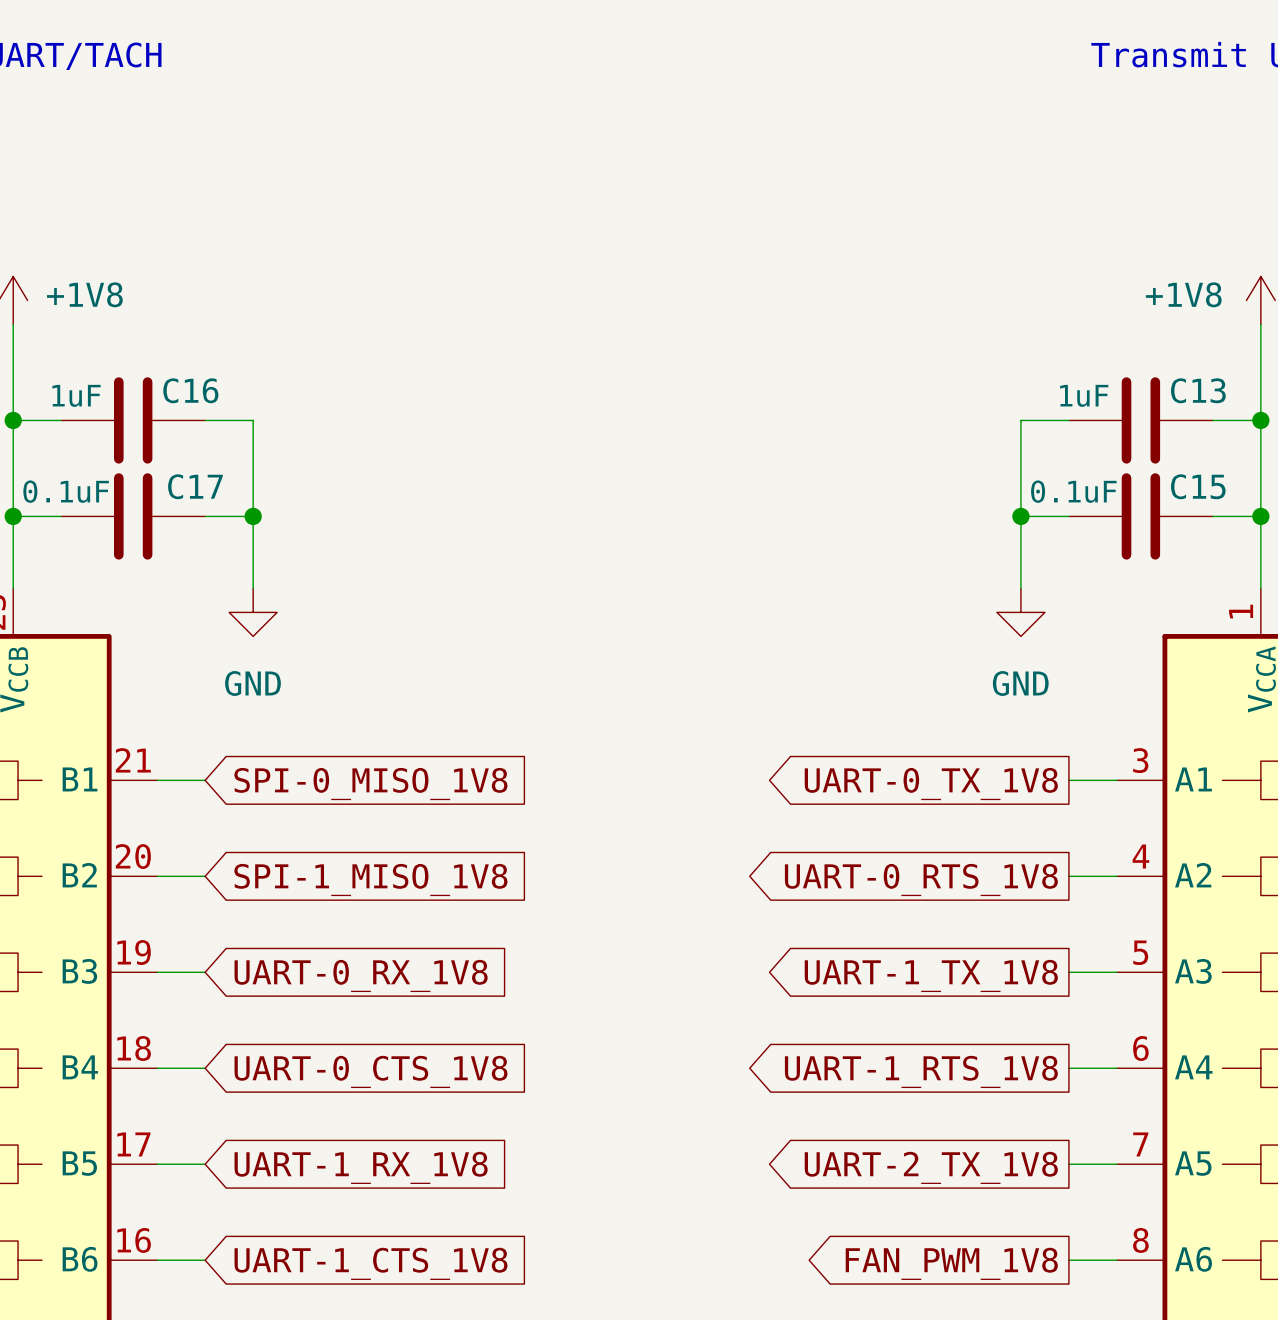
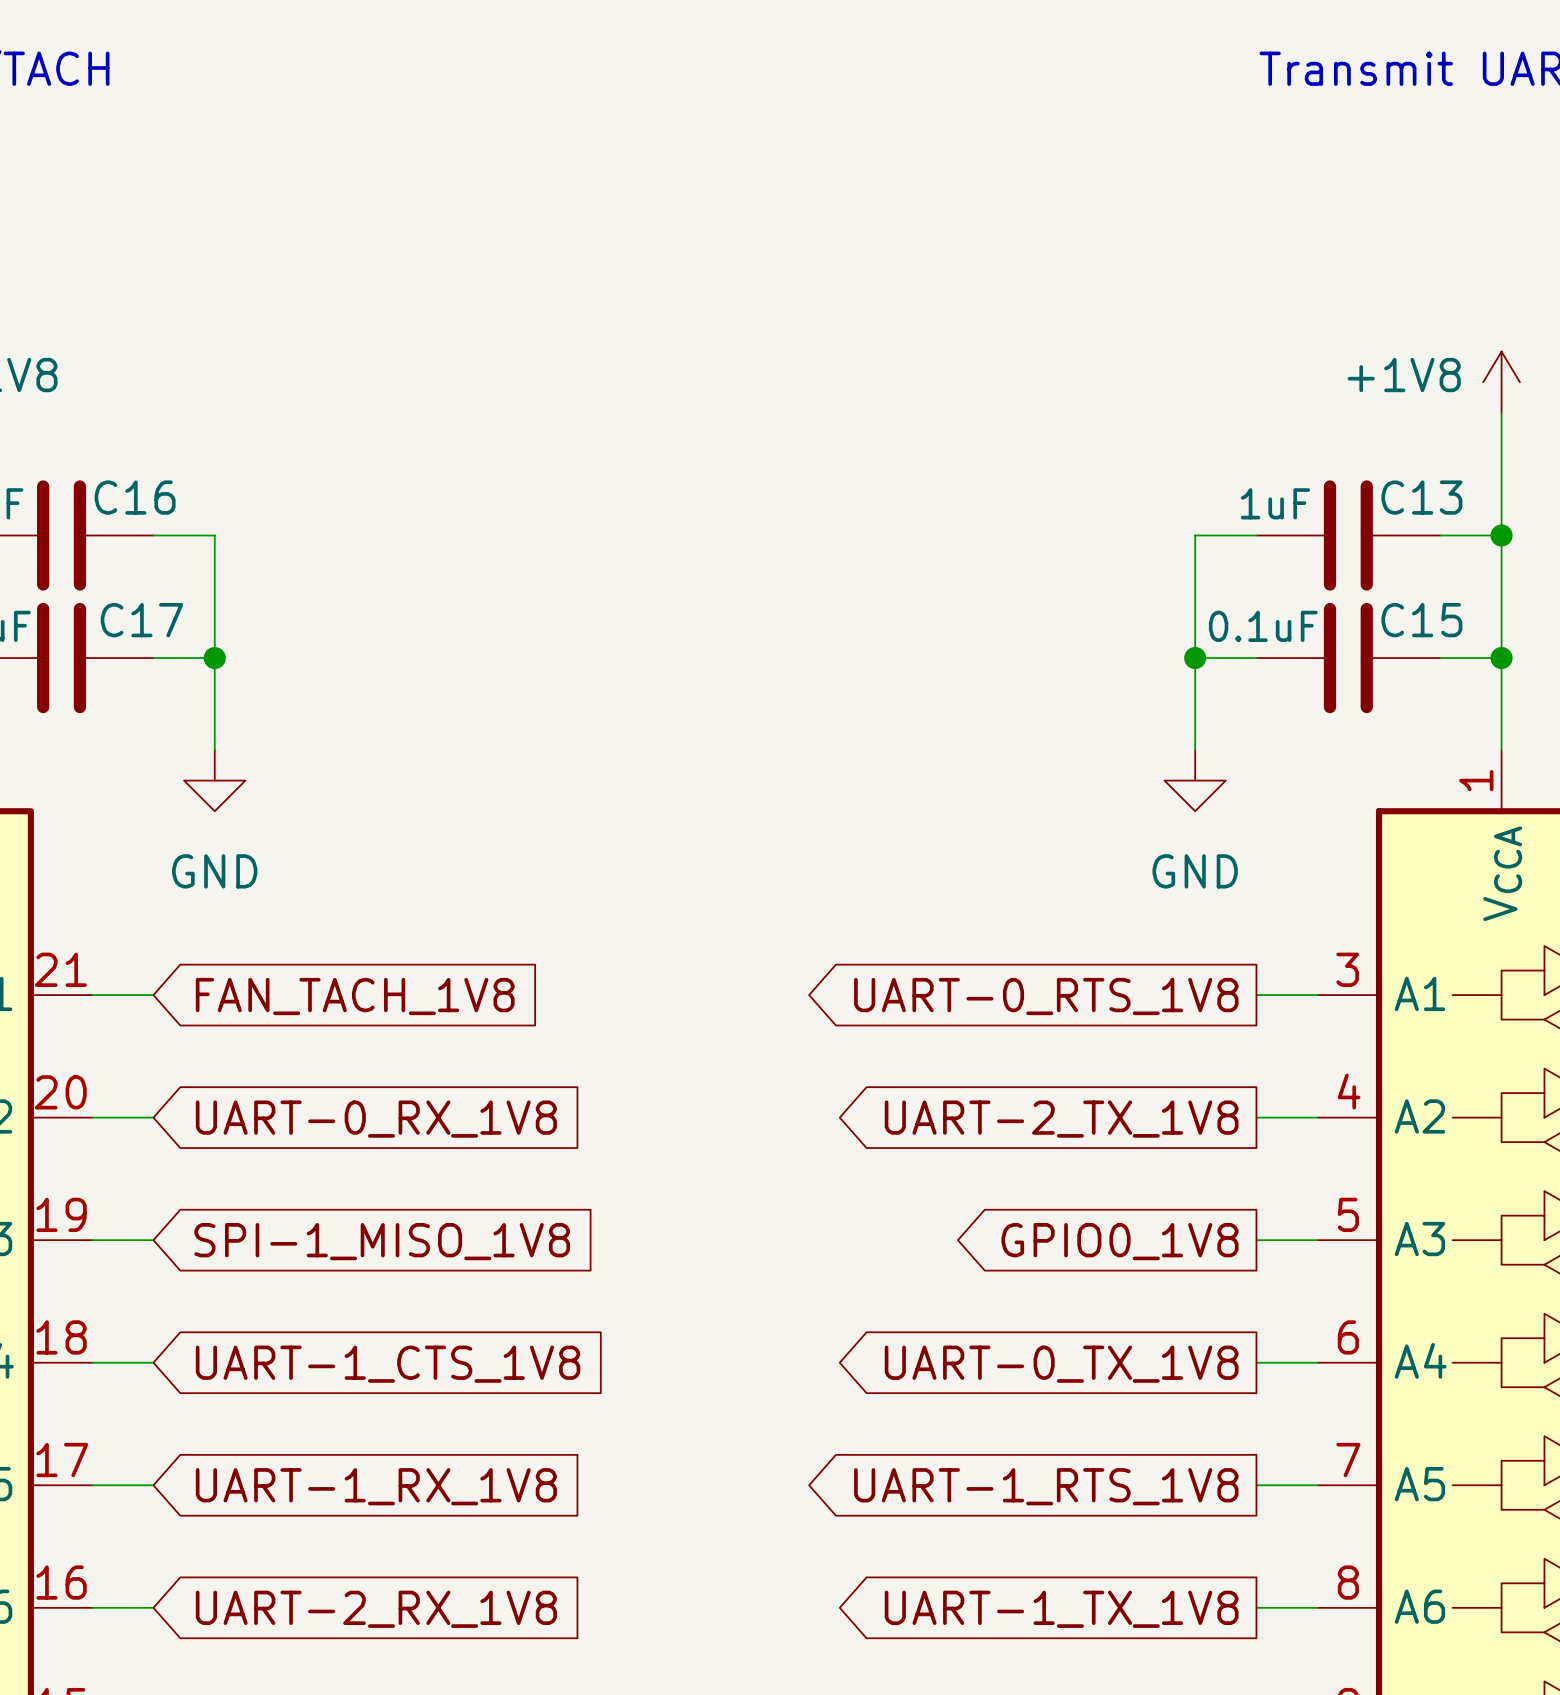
global label: SPI-0_MISO_1V8 (370, 784) -> FAN_TACH_1V8 (355, 996)
global label: UART-0_TX_1V8 (931, 784) -> UART-0_RTS_1V8 (1046, 996)
global label: SPI-1_MISO_1V8 (370, 879) -> UART-0_RX_1V8 (376, 1119)
global label: UART-0_RTS_1V8 (921, 879) -> UART-2_TX_1V8 (1061, 1119)
global label: UART-0_RX_1V8 (361, 975) -> SPI-1_MISO_1V8 (382, 1241)
global label: UART-1_TX_1V8 (931, 975) -> GPIO0_1V8 (1120, 1241)
global label: UART-0_CTS_1V8 (370, 1071) -> UART-1_CTS_1V8 (388, 1364)
global label: UART-1_RTS_1V8 (921, 1071) -> UART-0_TX_1V8 (1061, 1364)
global label: UART-2_TX_1V8 (931, 1167) -> UART-1_RTS_1V8 (1046, 1486)
global label: UART-1_CTS_1V8 (370, 1263) -> UART-2_RX_1V8 (376, 1609)
global label: FAN_PWM_1V8 (951, 1263) -> UART-1_TX_1V8 (1061, 1609)

